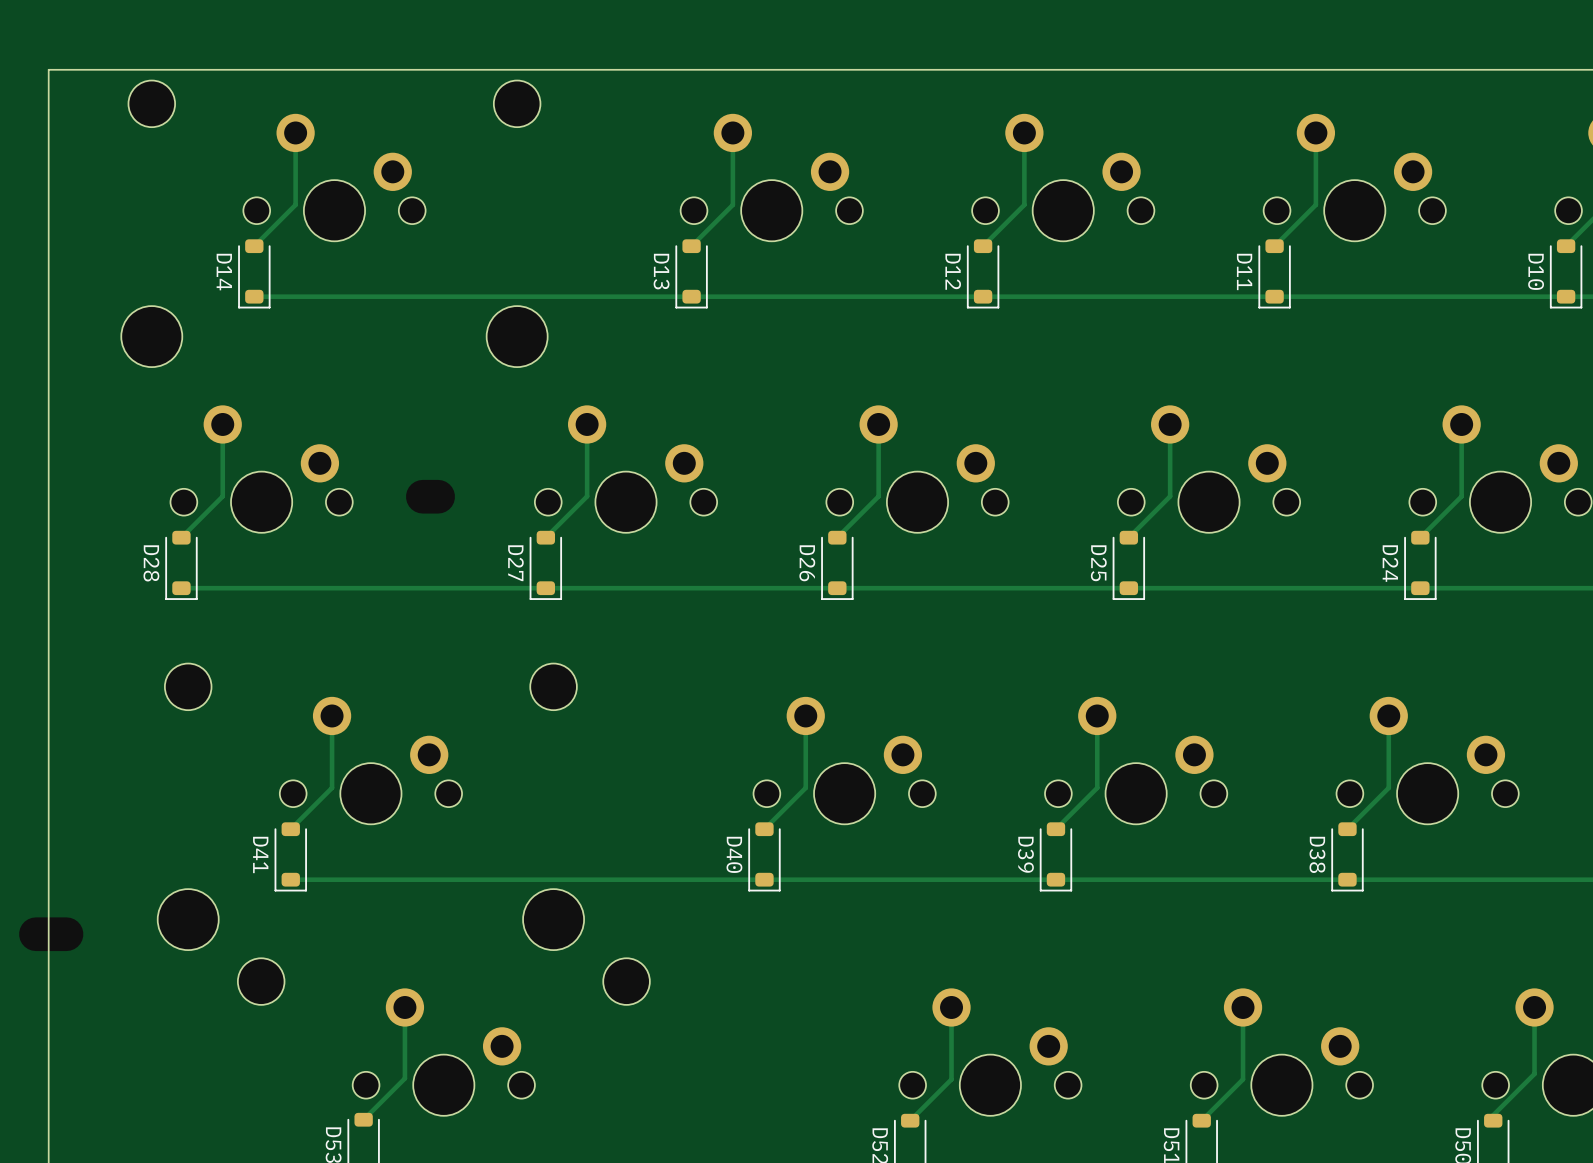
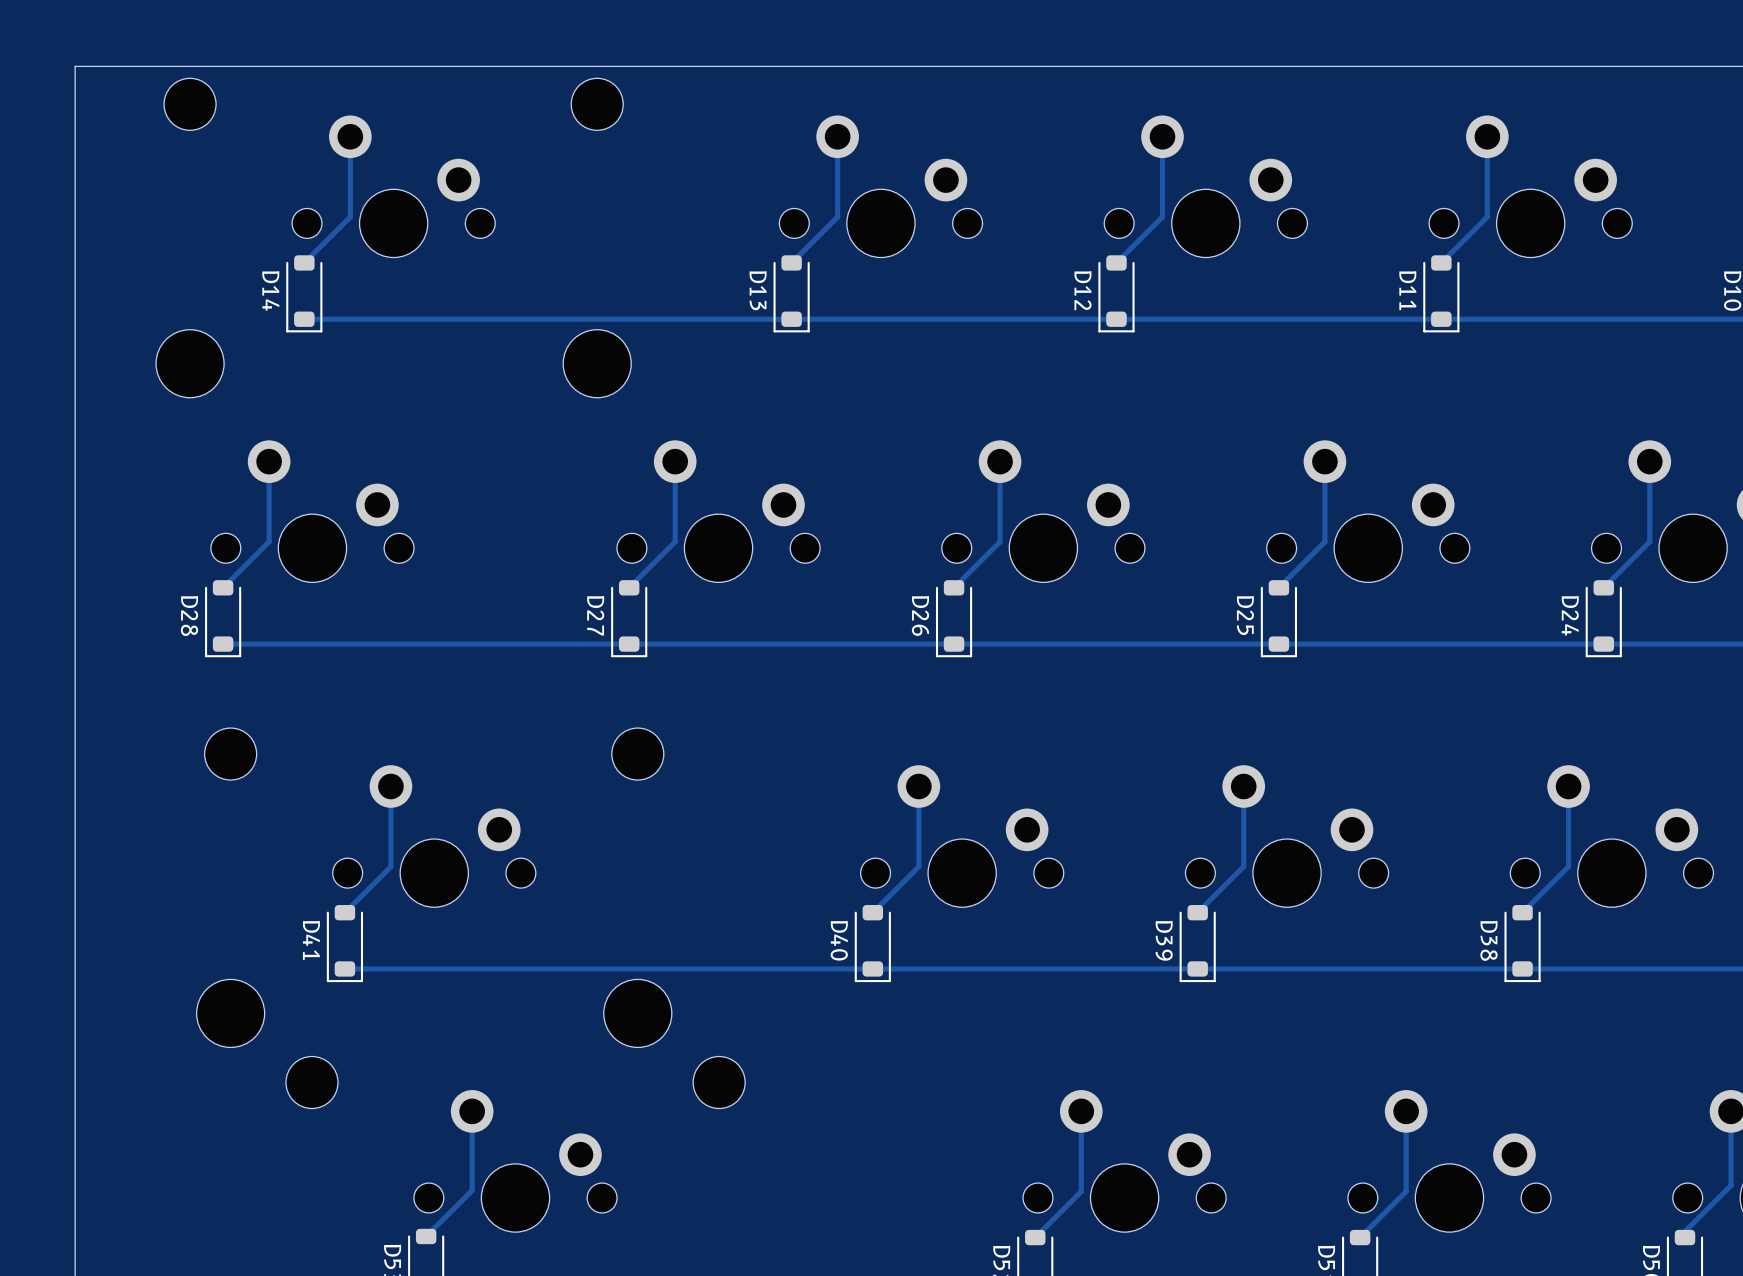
part: (430, 496) -> none
part: (51, 934) -> none

